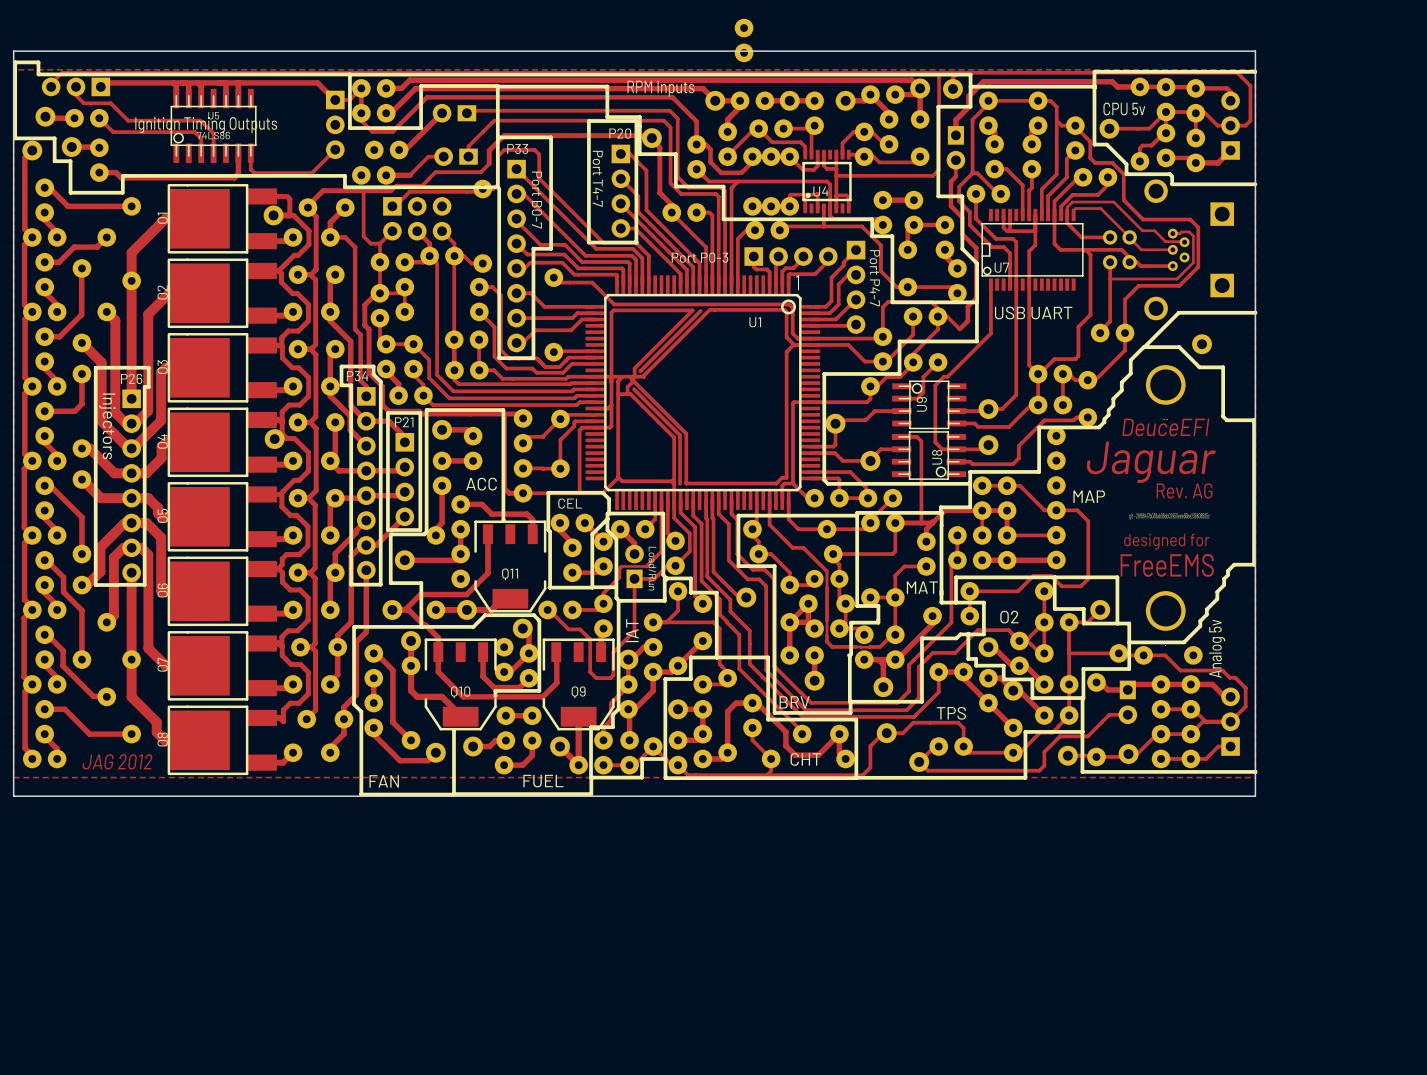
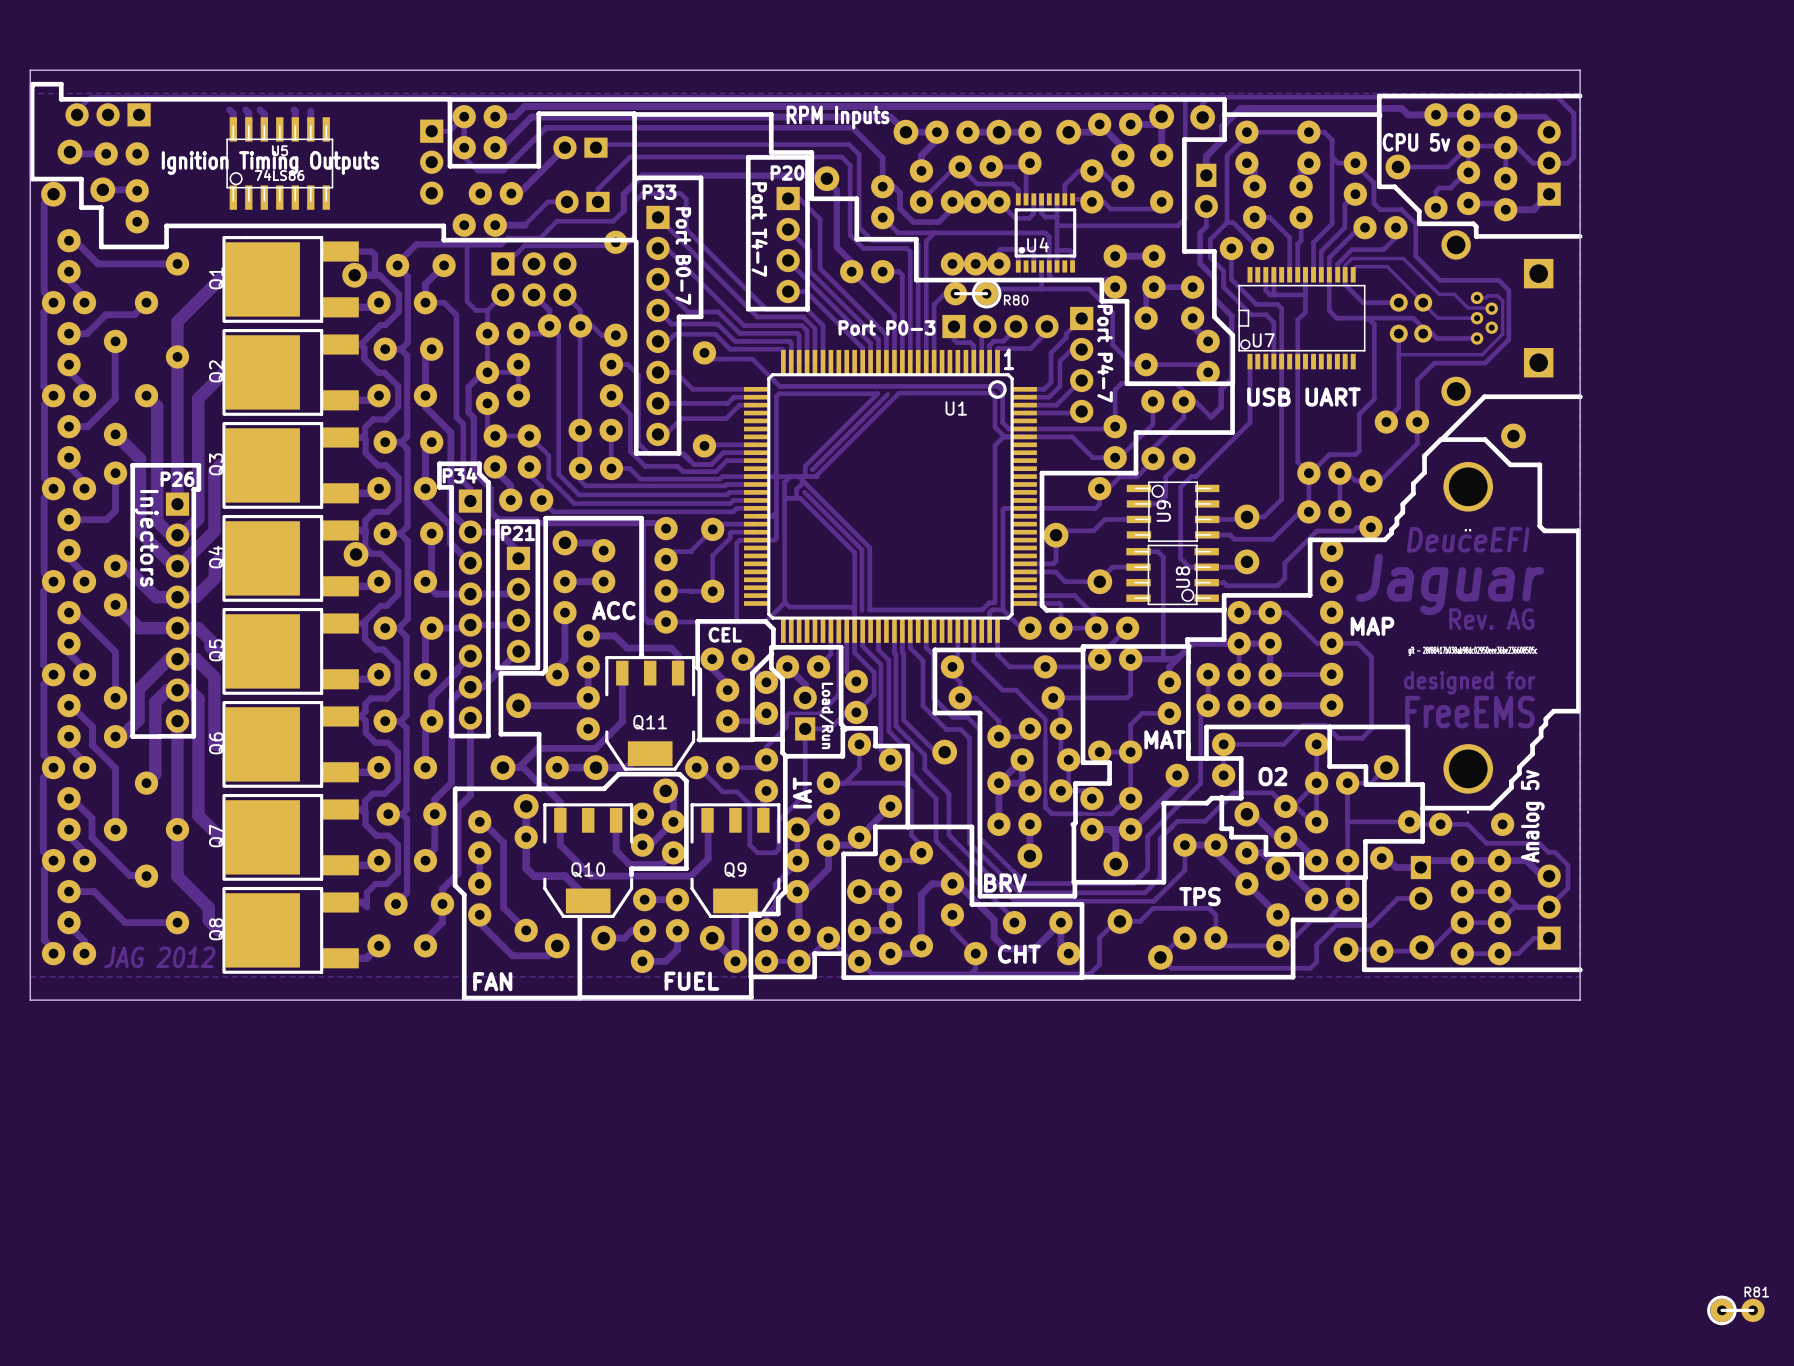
part: (744, 40) -> none
track: (76, 86) (76, 95) (83, 103) (110, 103) (128, 120) (200, 120) (213, 133) (213, 153) -> none
track: (100, 86) (104, 82) (317, 82) (335, 100) -> none
track: (99, 118) (113, 132) (194, 132) (201, 138) (201, 153) -> none
track: (335, 149) (311, 173) (254, 173) (250, 169) (250, 153) -> none
track: (238, 153) (238, 173) (234, 177) (121, 177) (115, 172) (99, 172) -> none
R80 side: bottom (767, 230) -> top (972, 293)
R81: none -> (1735, 1310)

